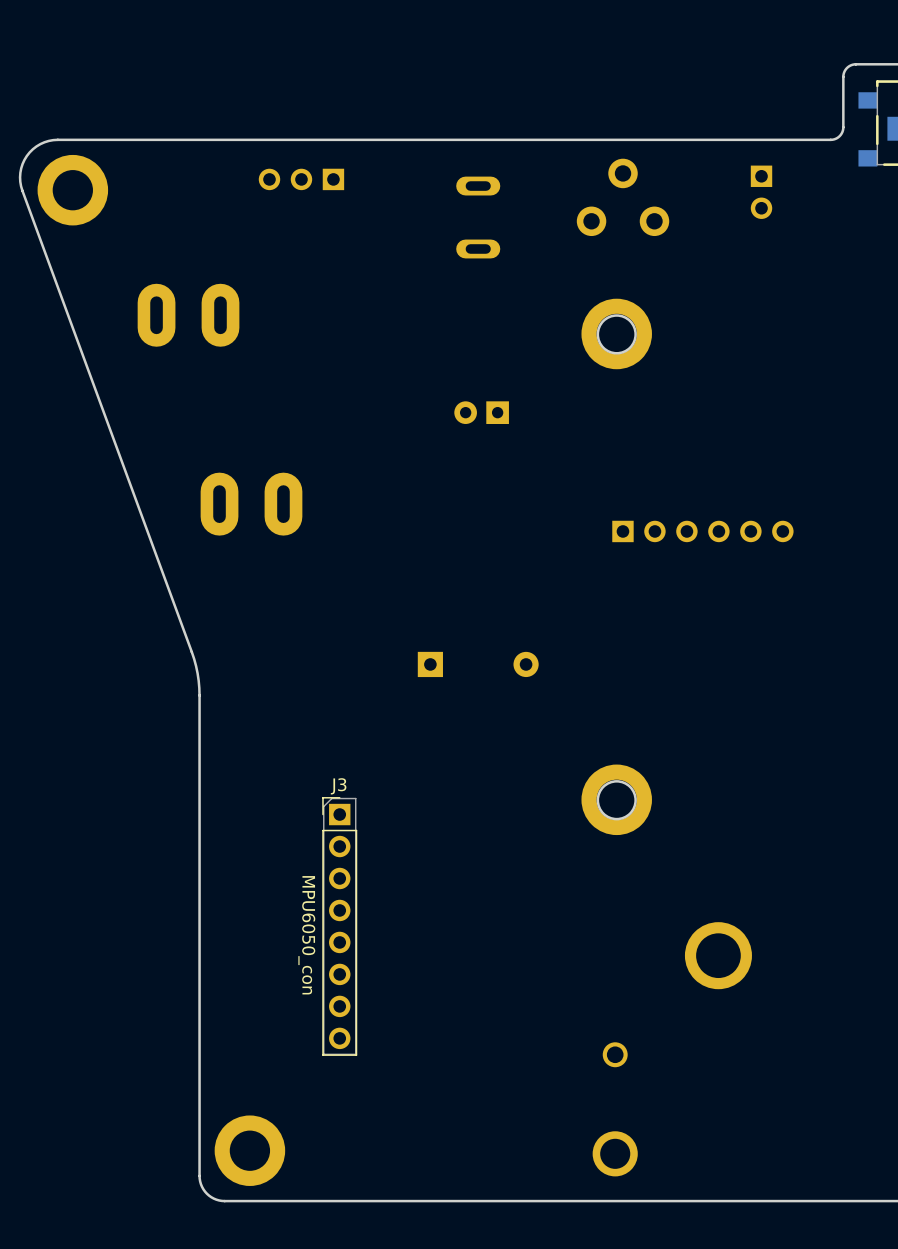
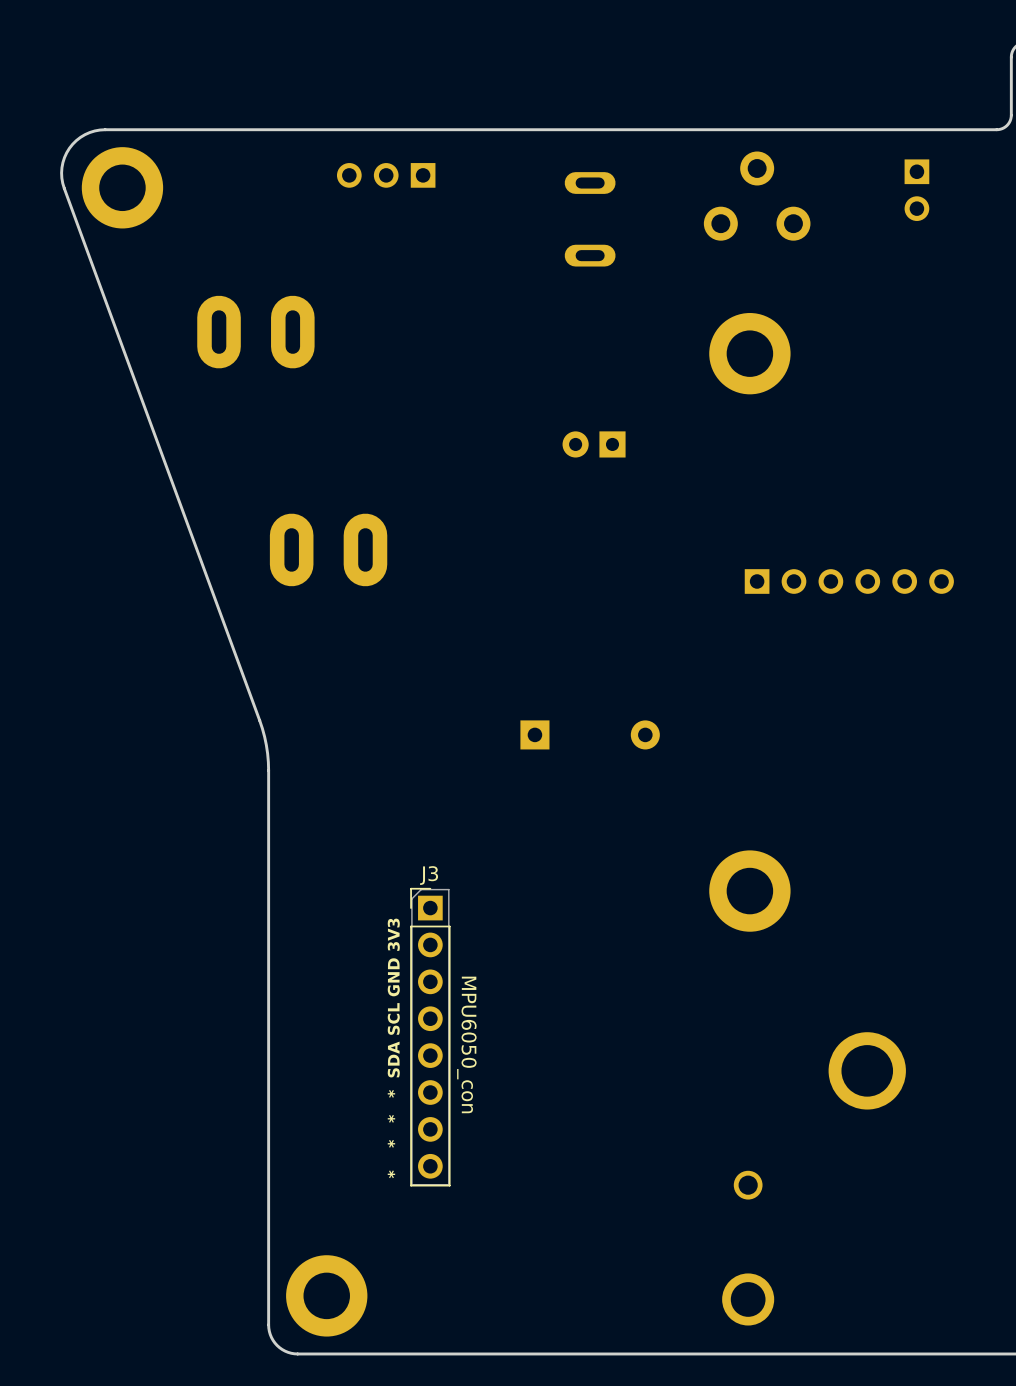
round board edge: [596, 314, 637, 355] -> none
round board edge: [596, 780, 637, 821] -> none
J3 value position: MPU6050_con (306, 935) -> MPU6050_con (466, 1044)
text: none -> * * * * SDA SCL GND 3V3 (393, 1048)

